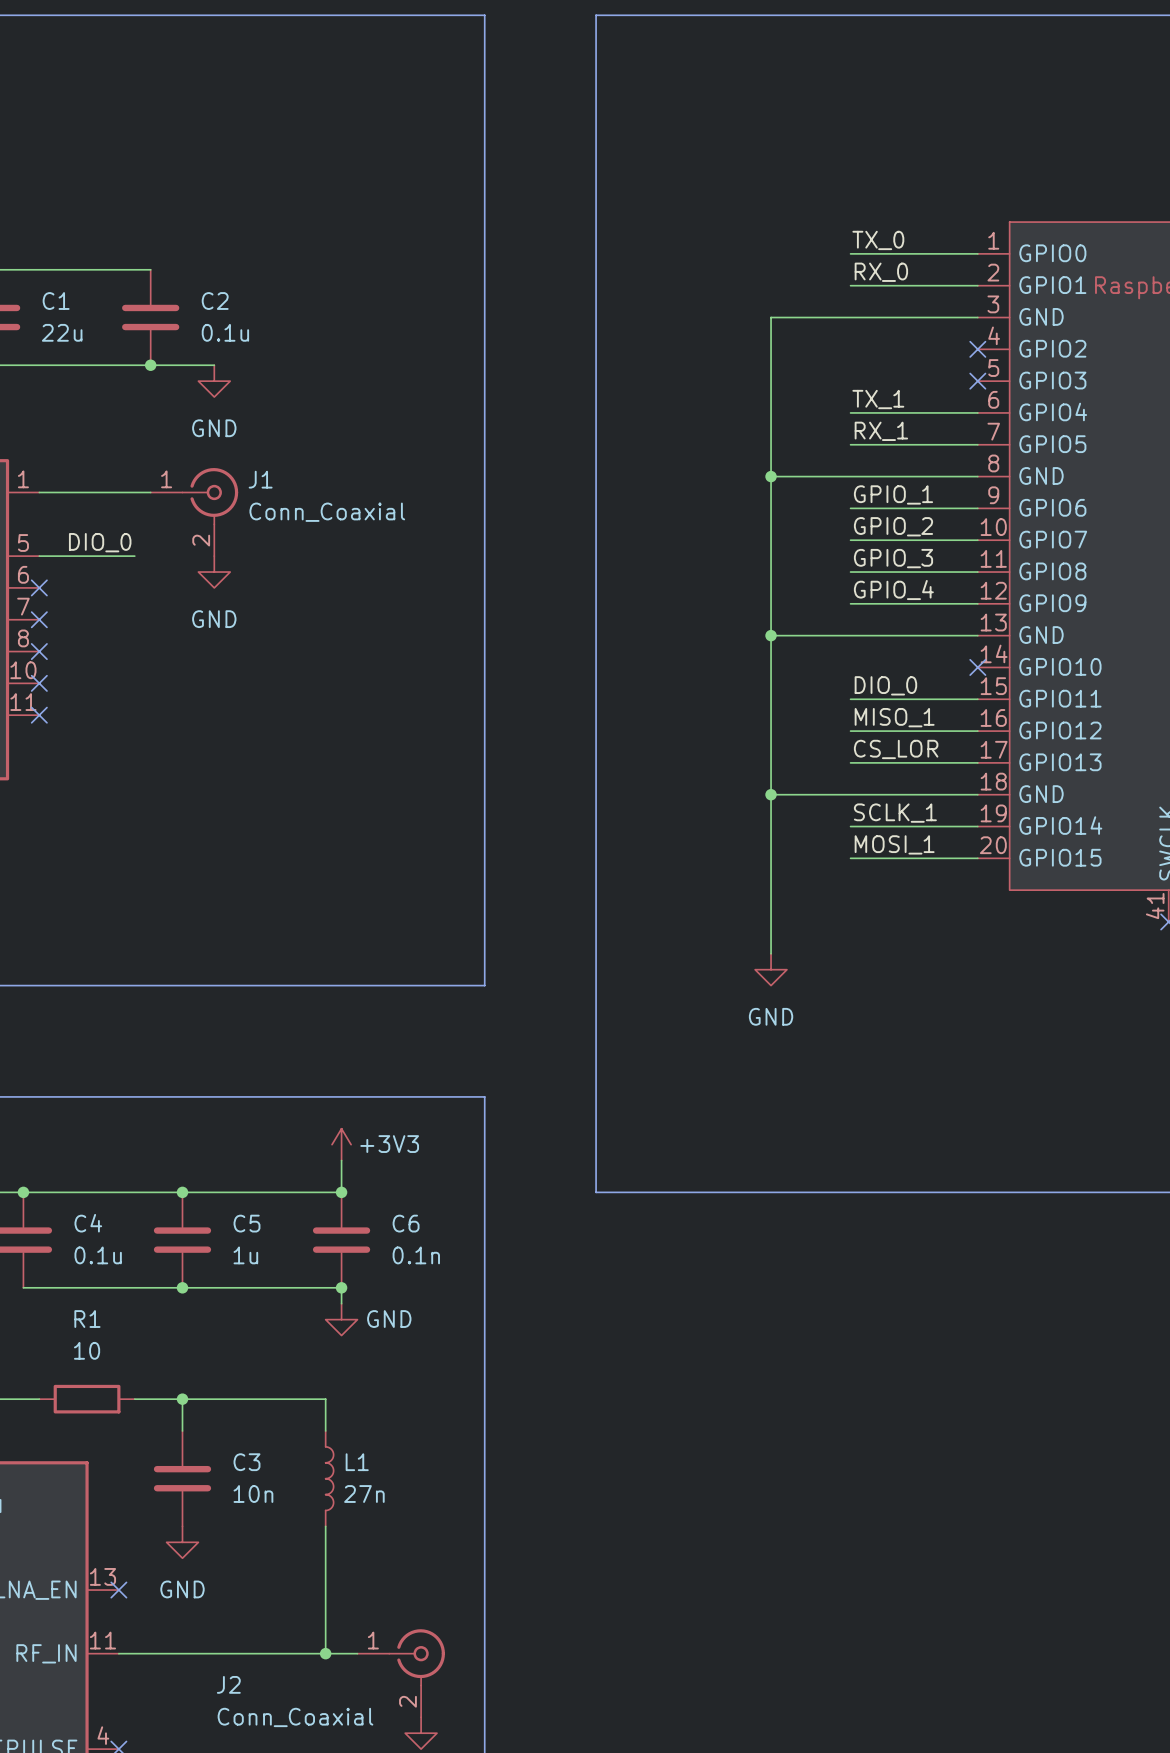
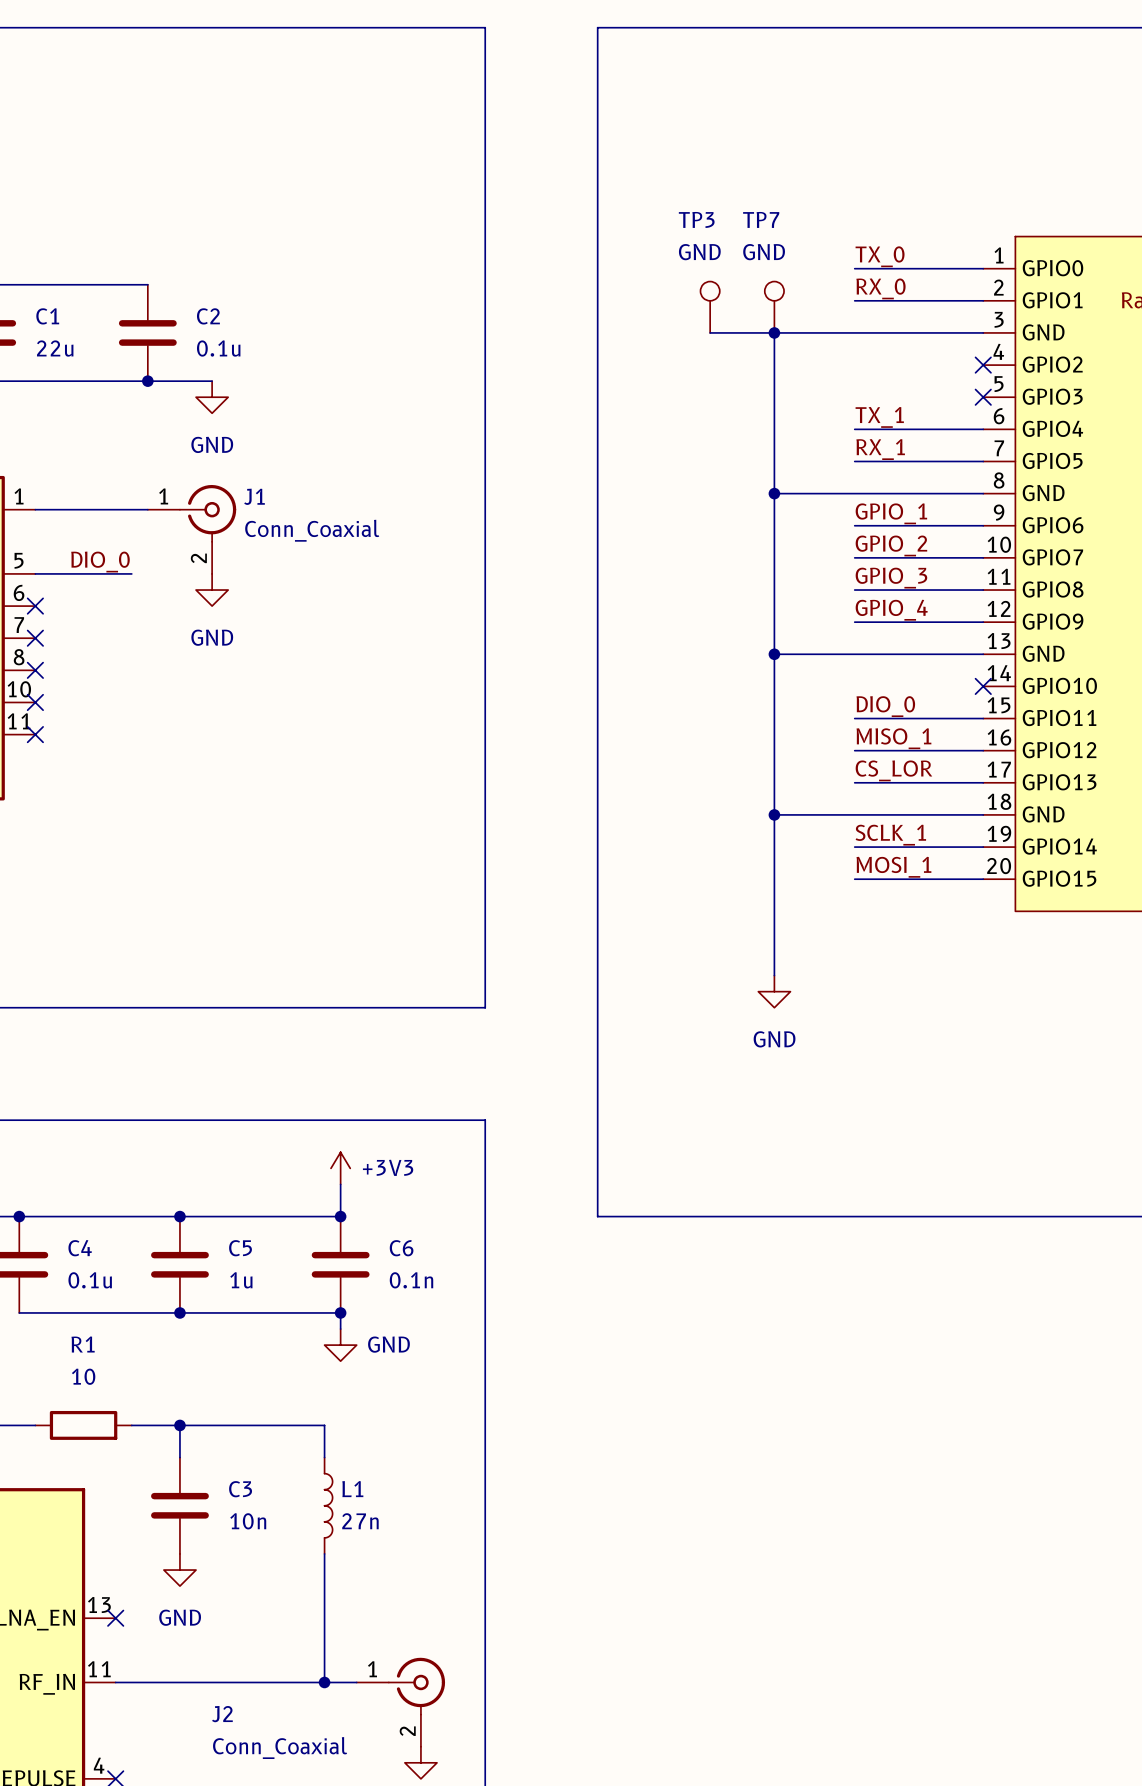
TP3: none -> GND (710, 307)
TP7: none -> GND (774, 307)
wire: none -> (710, 332) (774, 332)
junction: none -> (774, 332)

